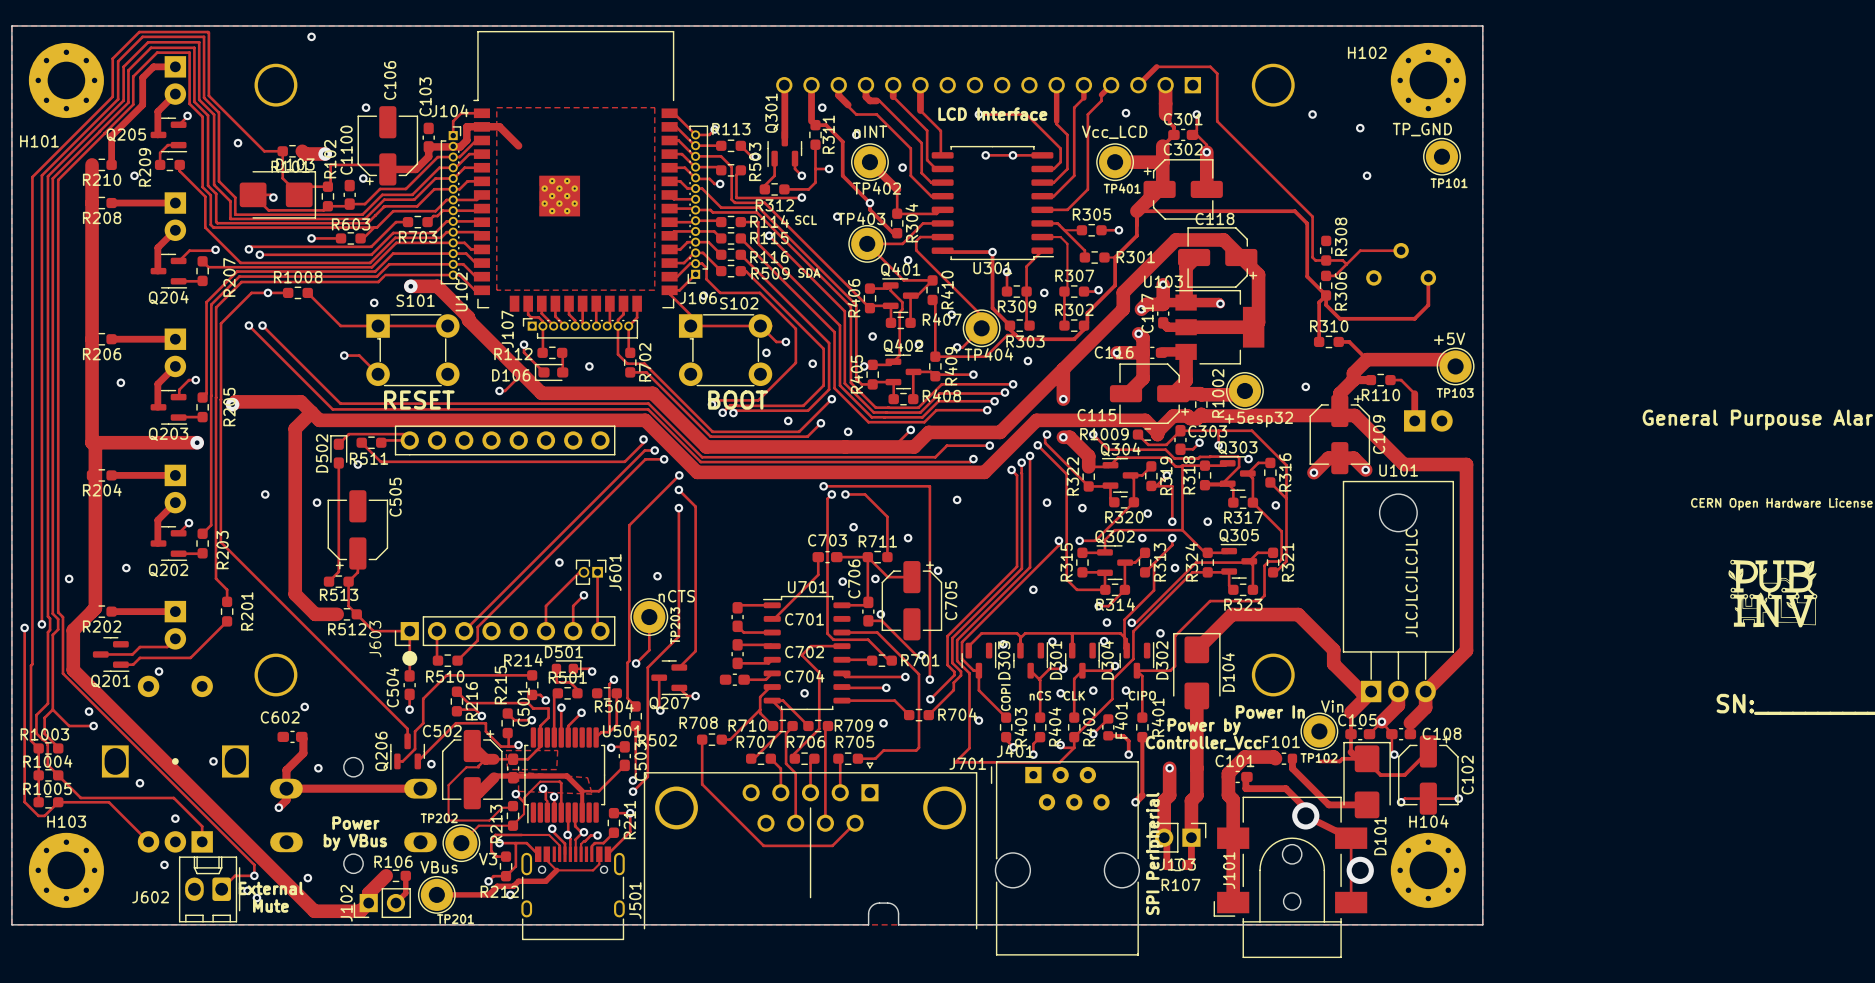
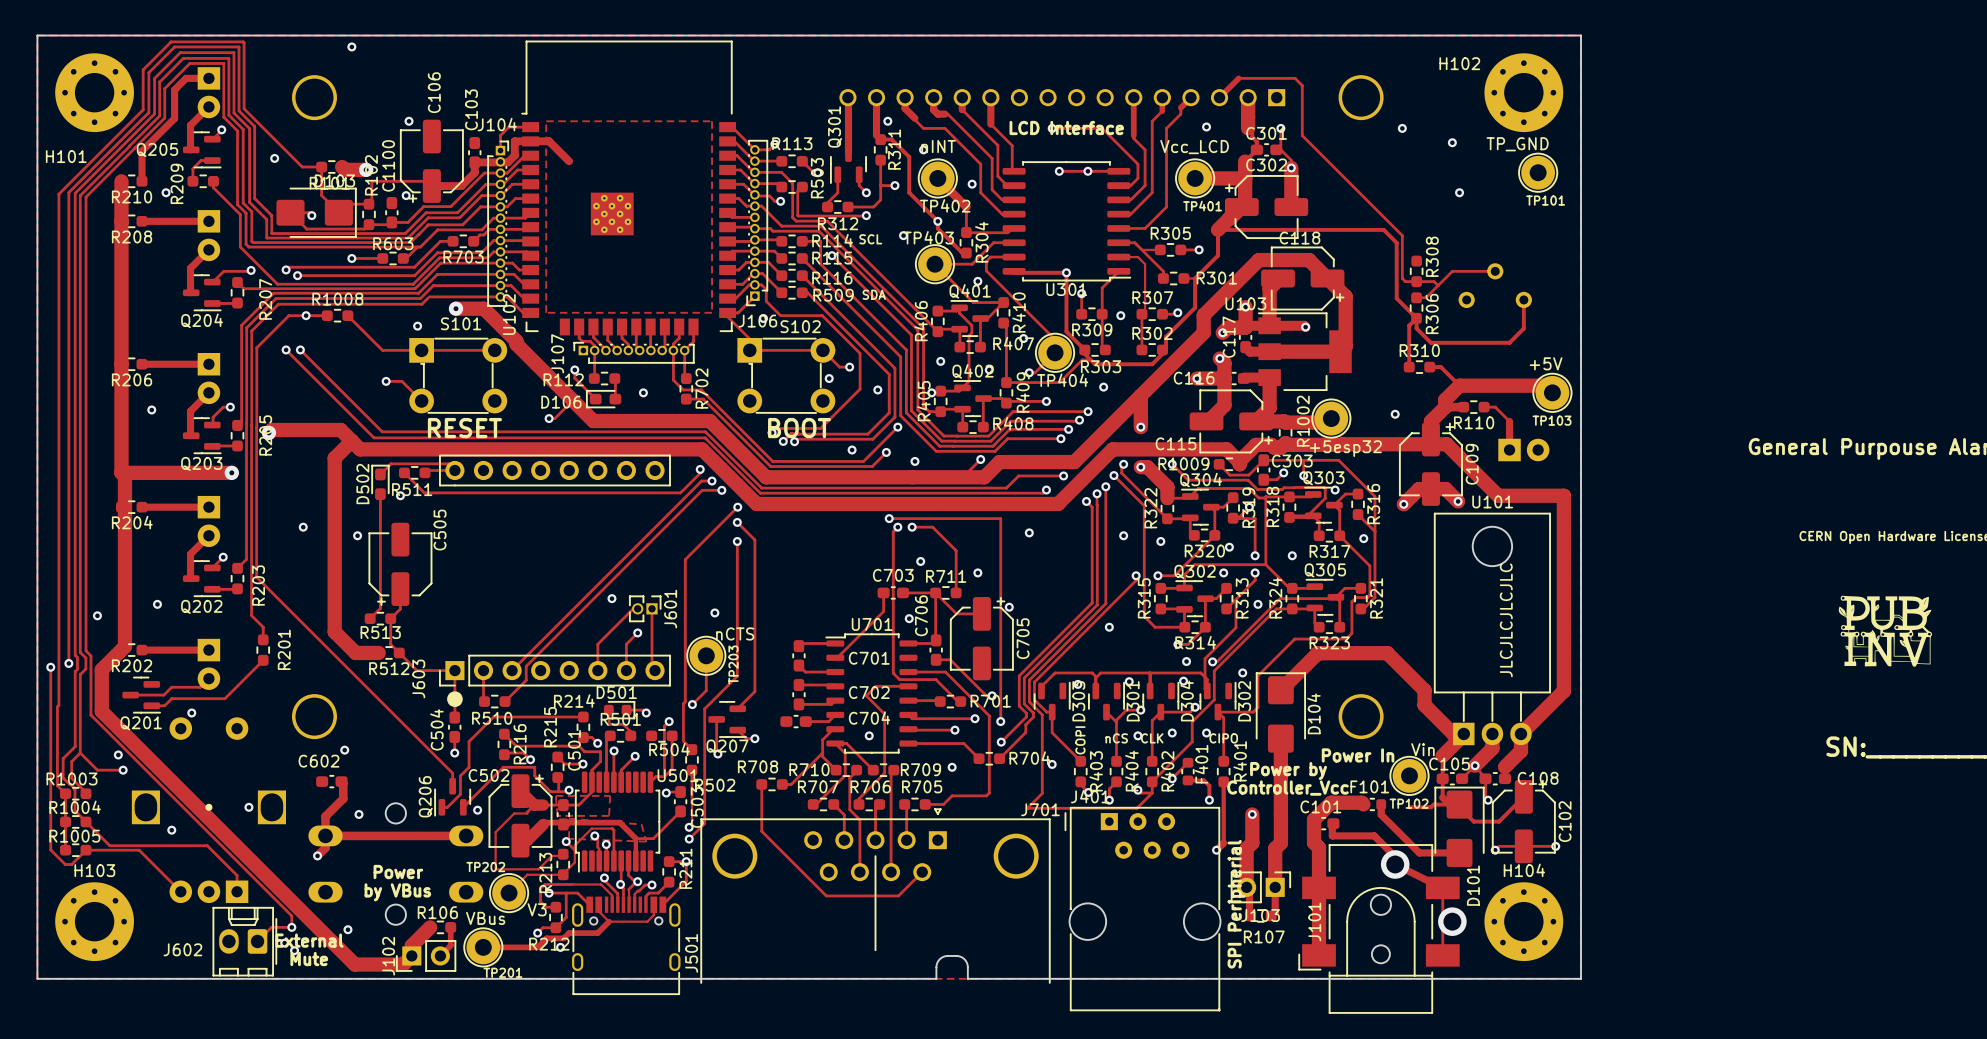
via: (875, 578) -> none
via: (880, 614) -> none
via: (175, 818) -> none
via: (164, 864) -> none

